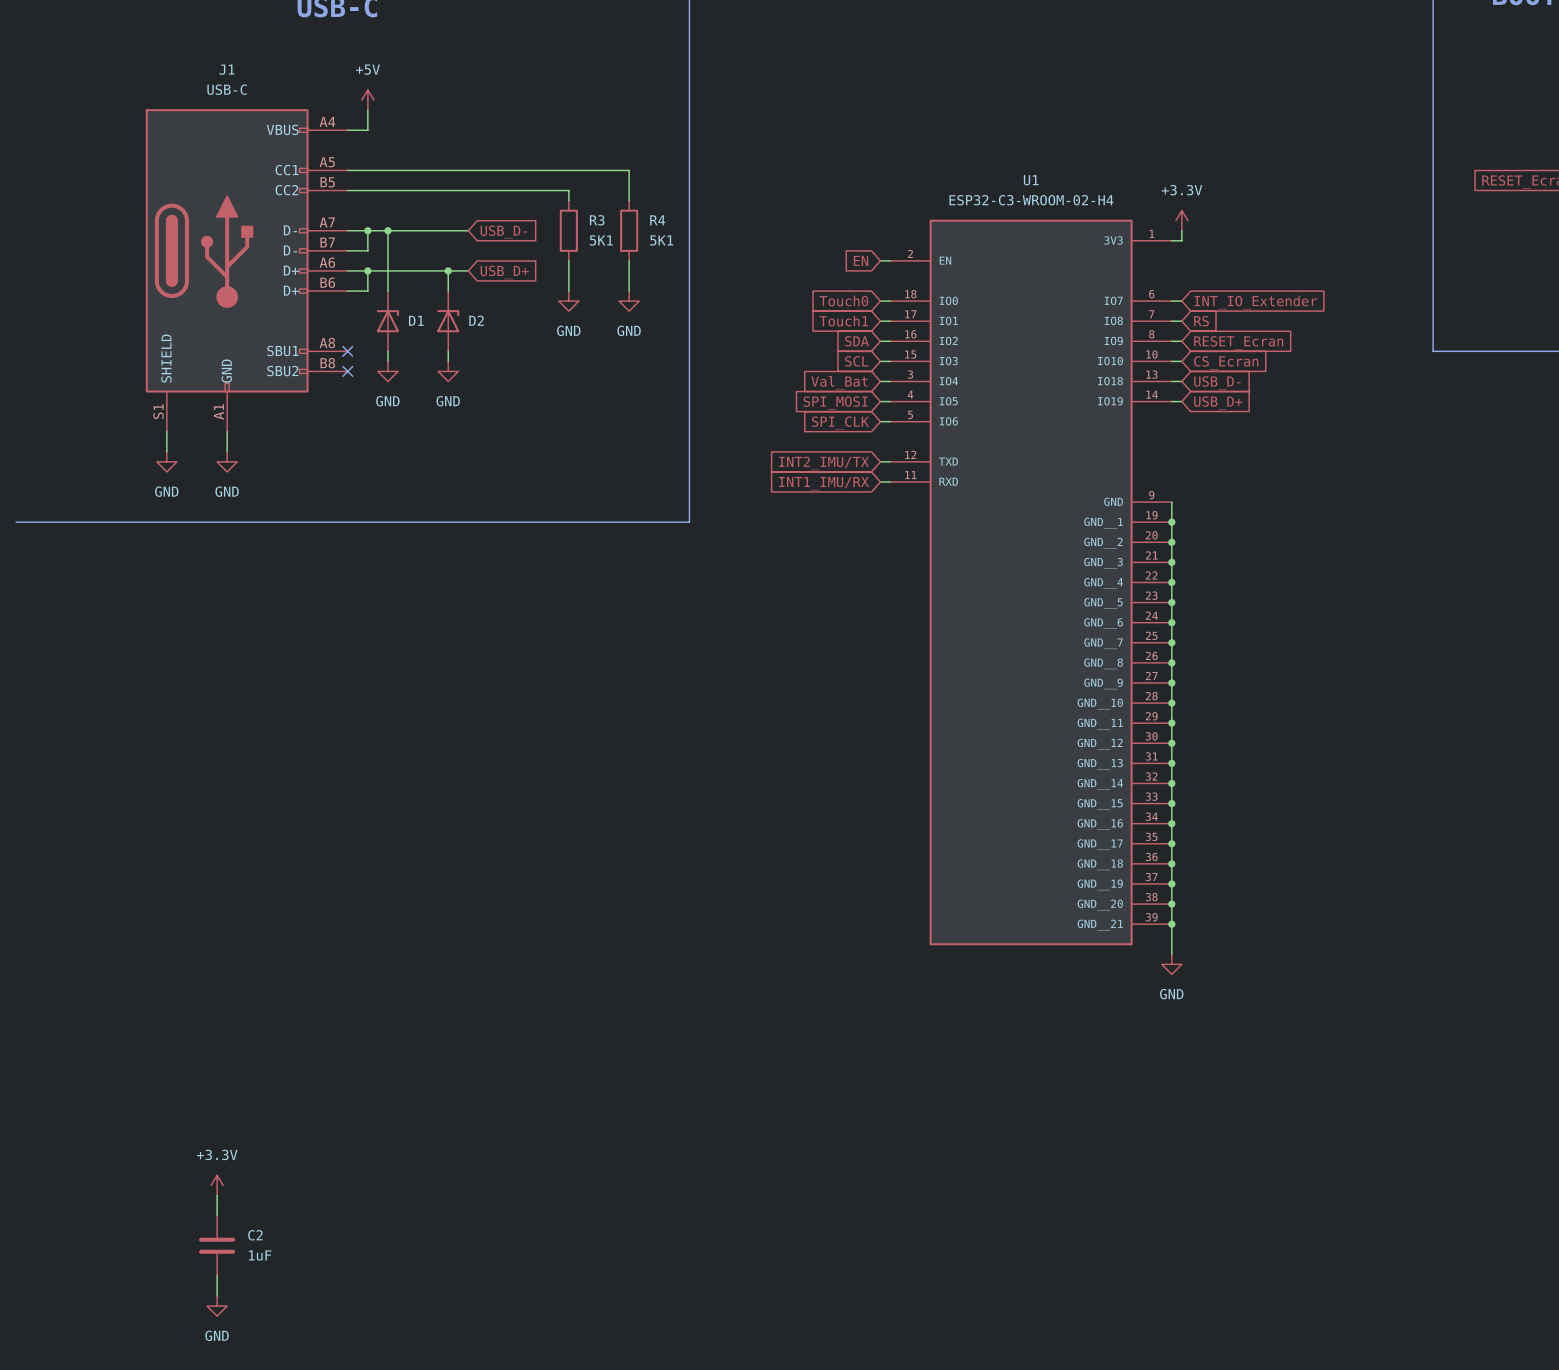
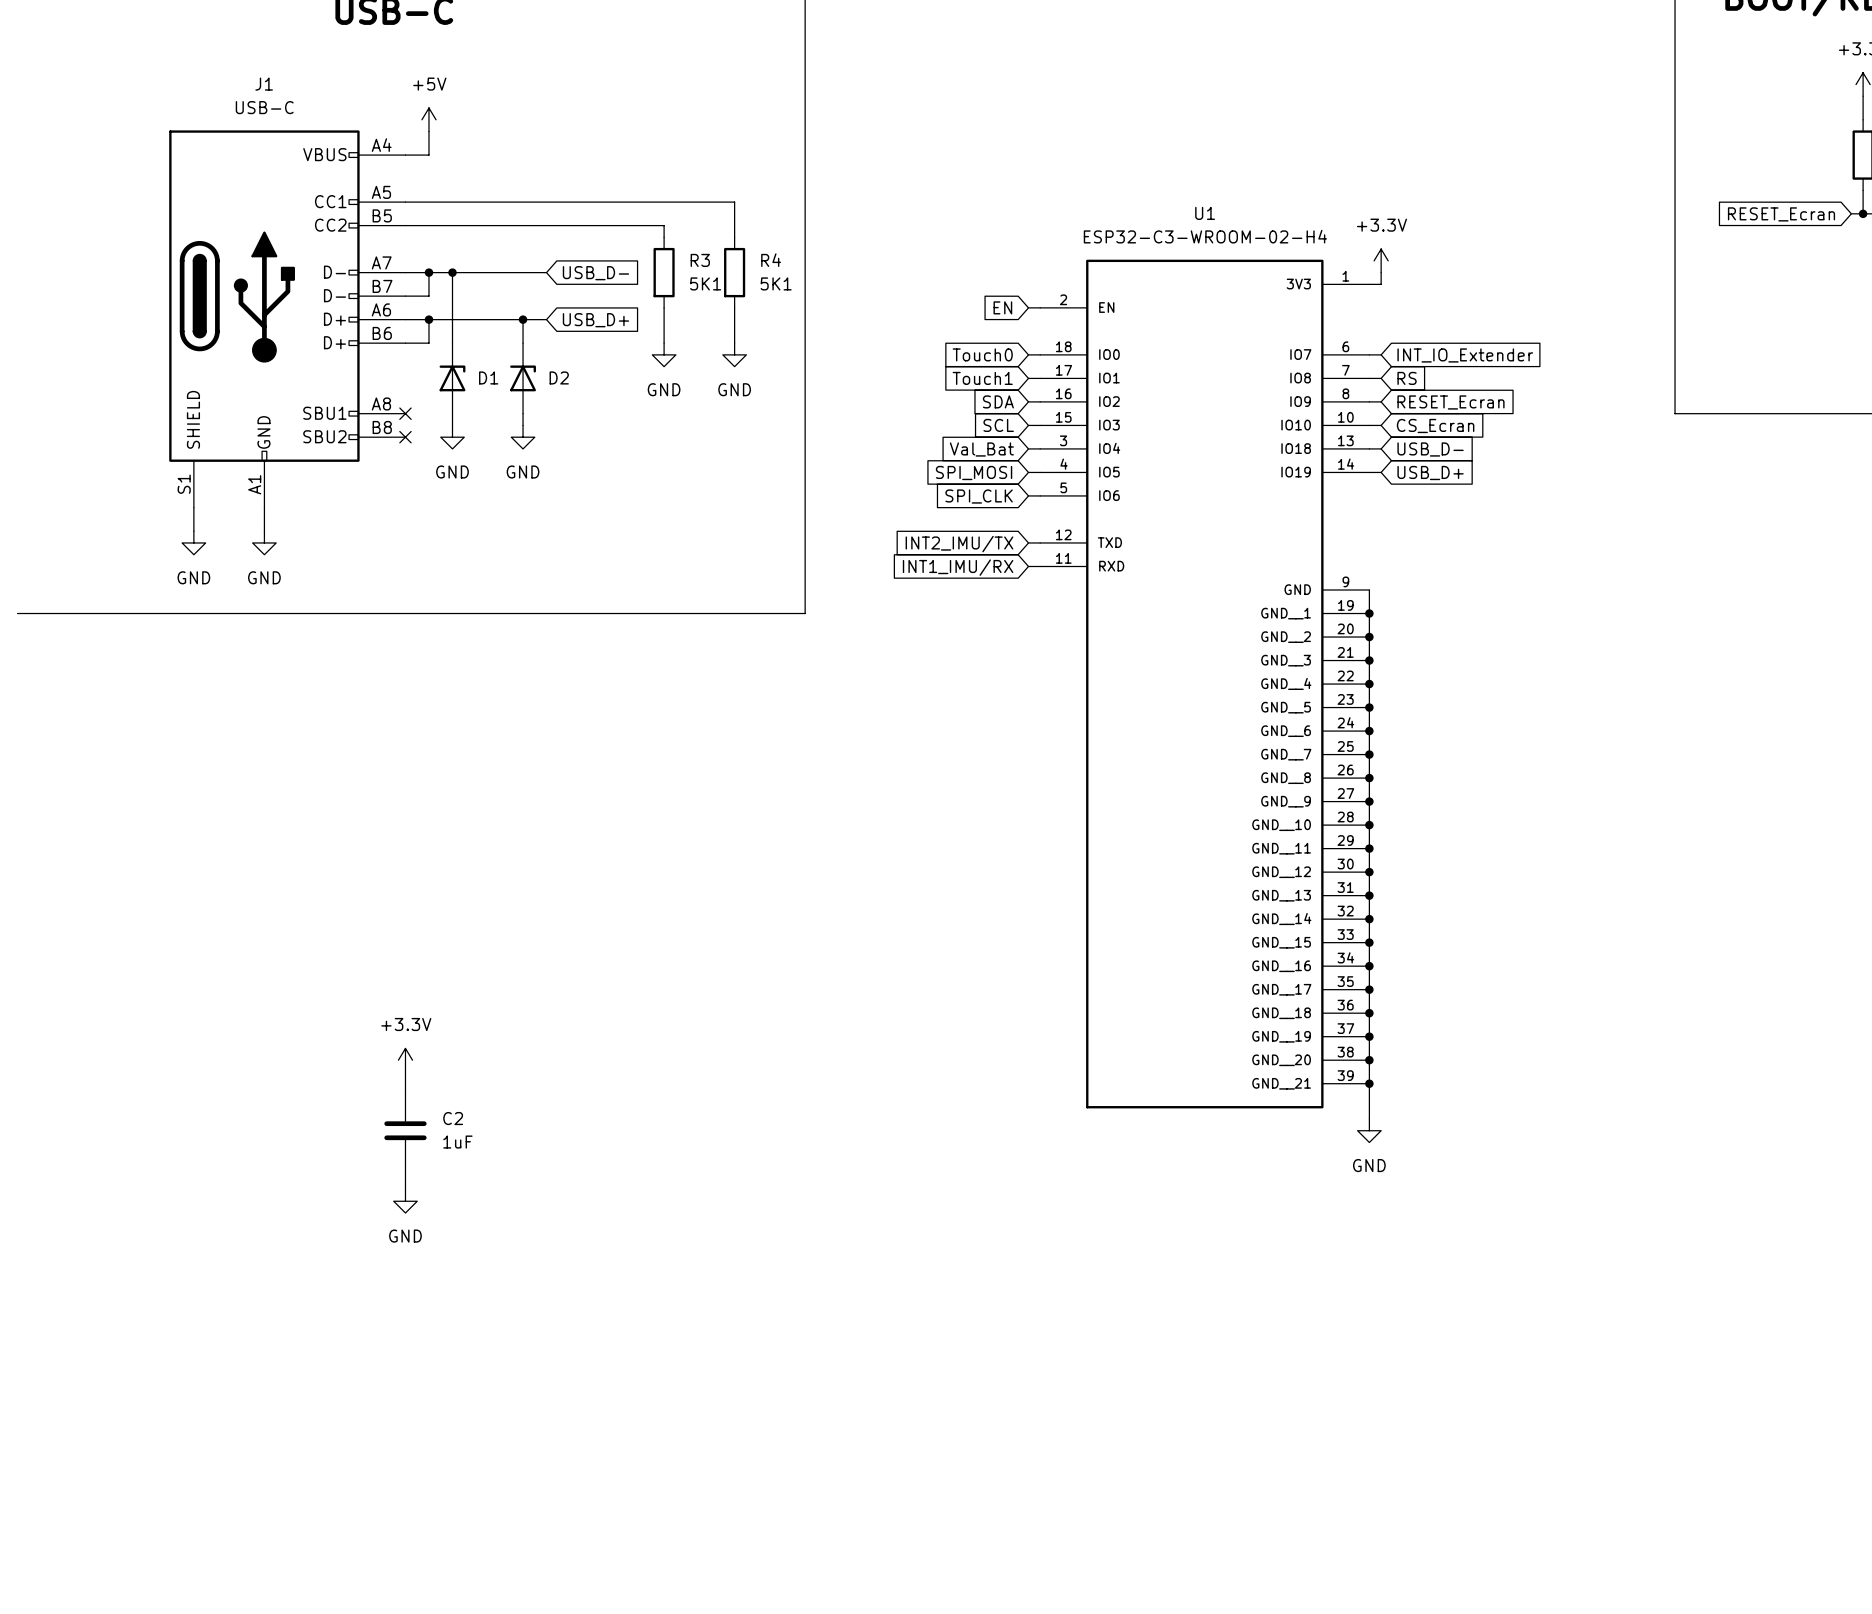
power symbol: none -> +3.3V (405, 1060)
wire: none -> (405, 1071) (405, 1095)
wire: none -> (405, 1165) (405, 1189)
power symbol: none -> GND (405, 1201)
power symbol: +3.3V (217, 1185) -> none
wire: (217, 1195) (217, 1215) -> none
C2 position: (217, 1245) -> (405, 1130)
wire: (217, 1275) (217, 1296) -> none
power symbol: GND (217, 1306) -> none

